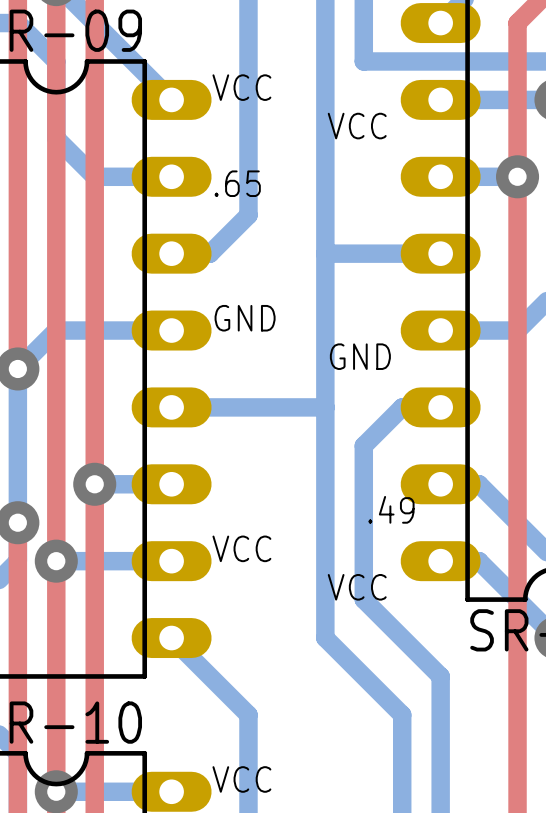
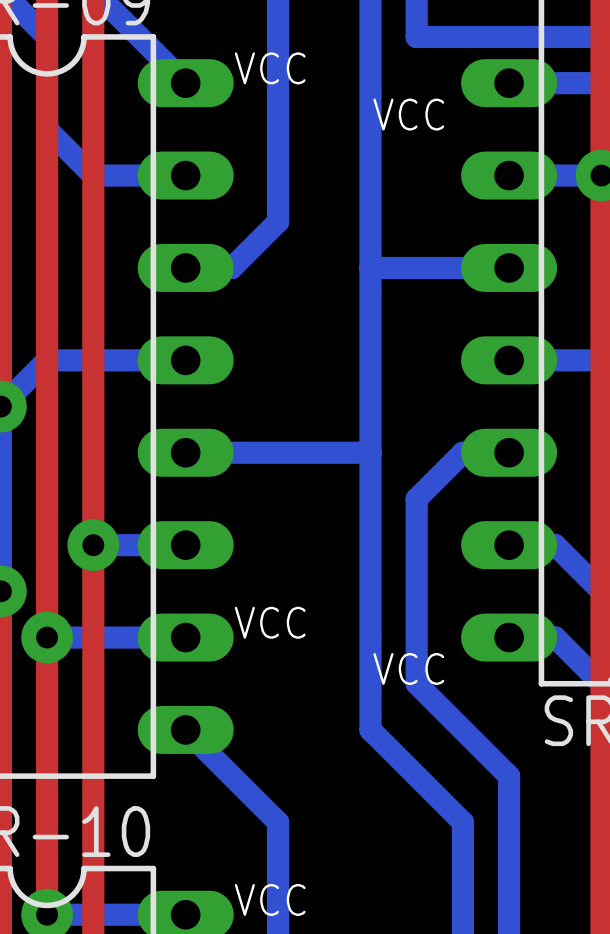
text: .65 (237, 183) -> none
text: GND (245, 318) -> none
text: GND (360, 356) -> none
text: .49 (391, 509) -> none

